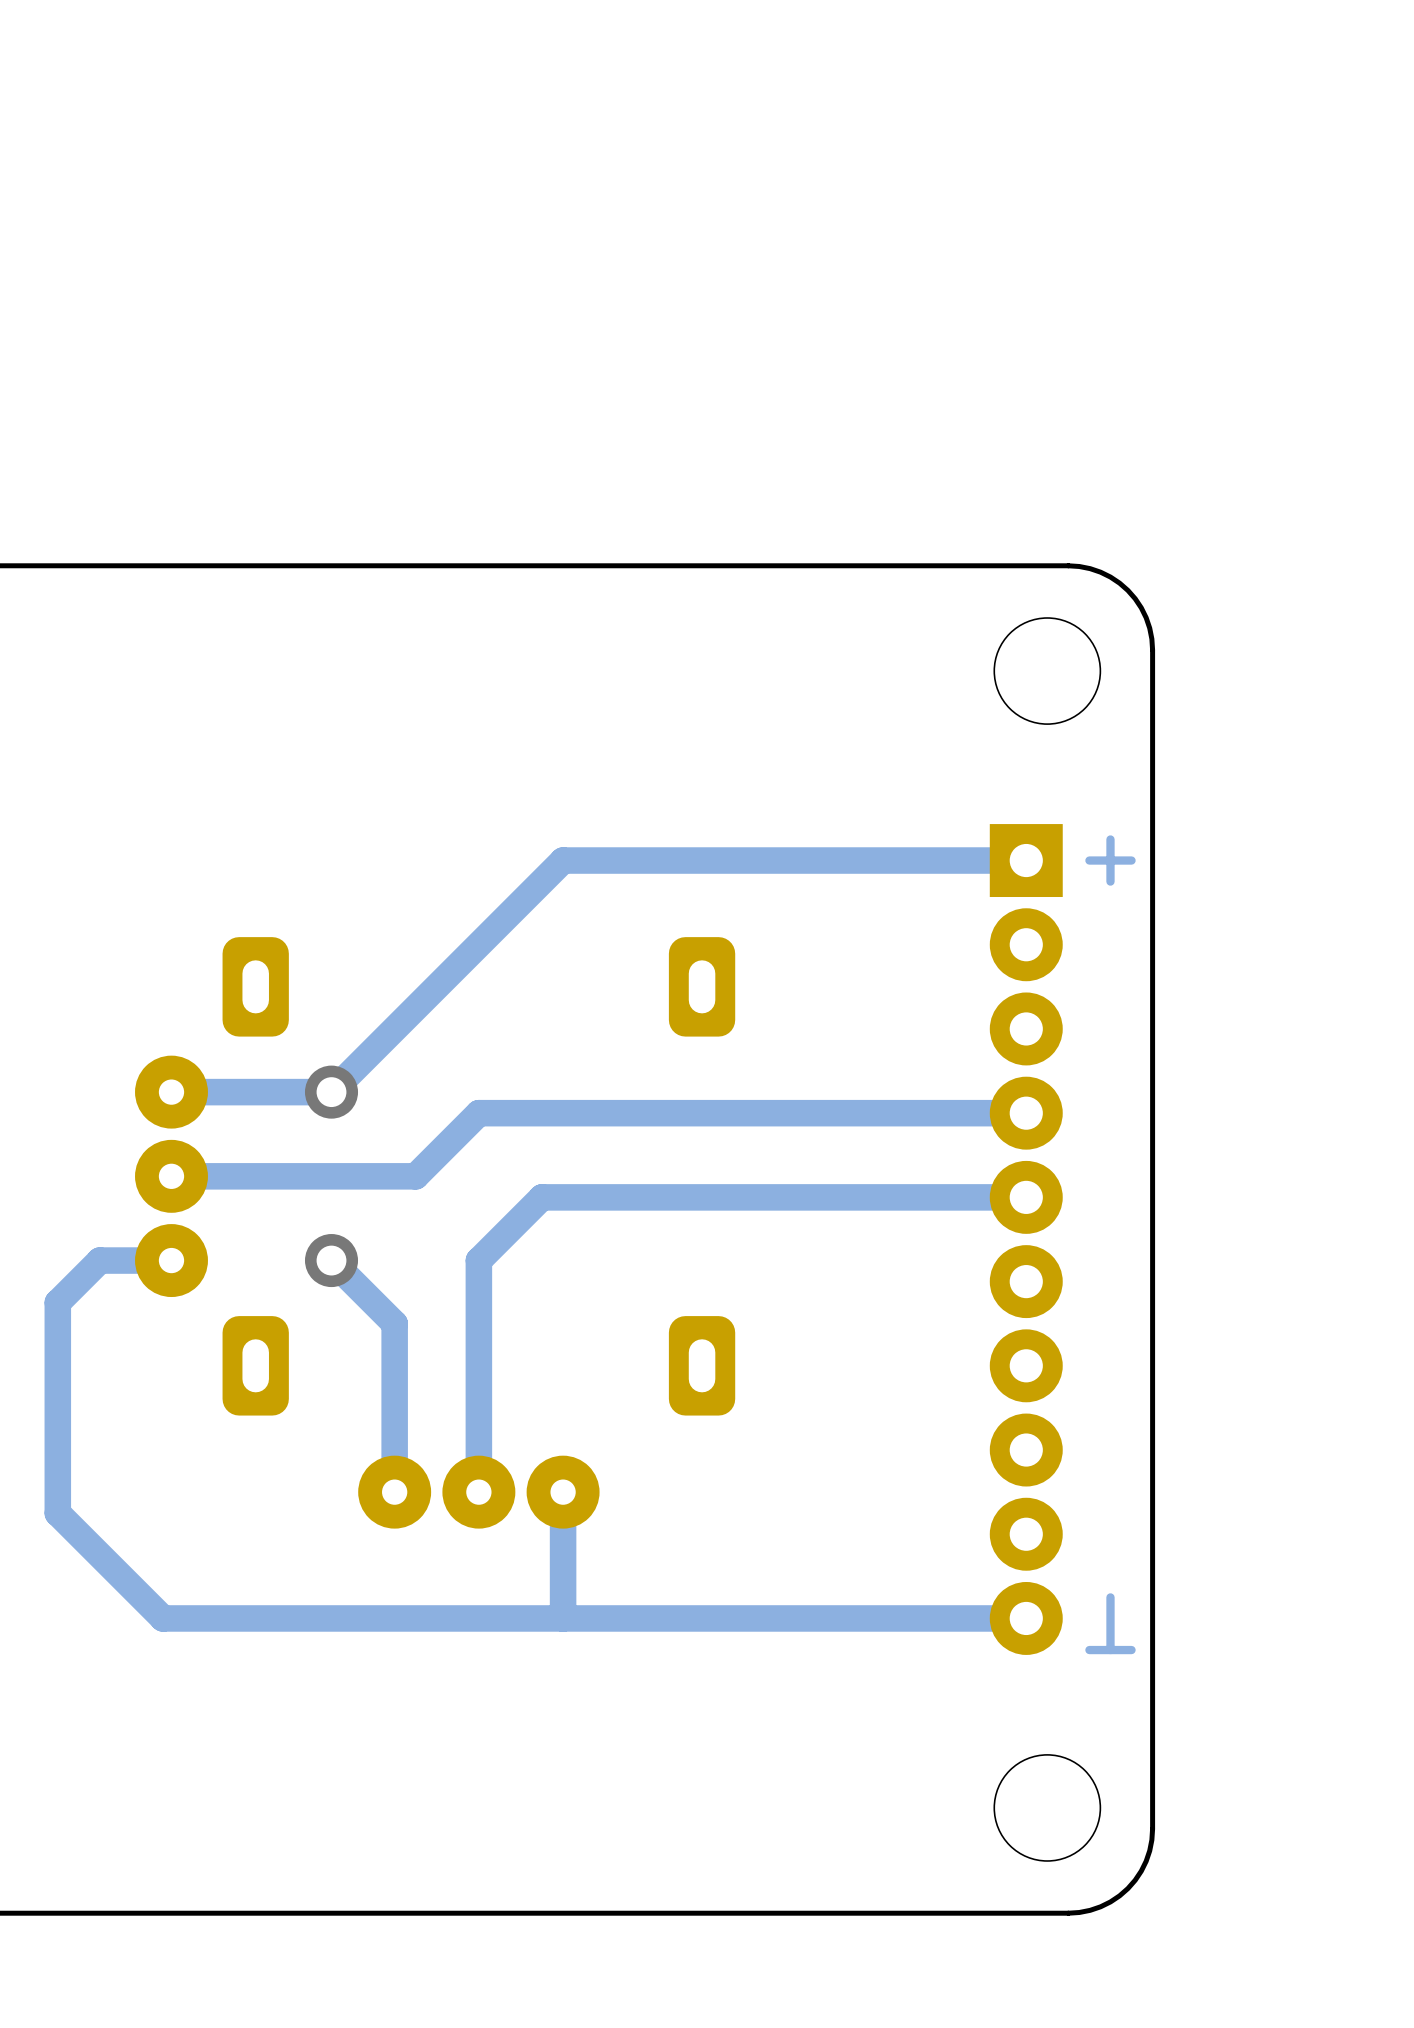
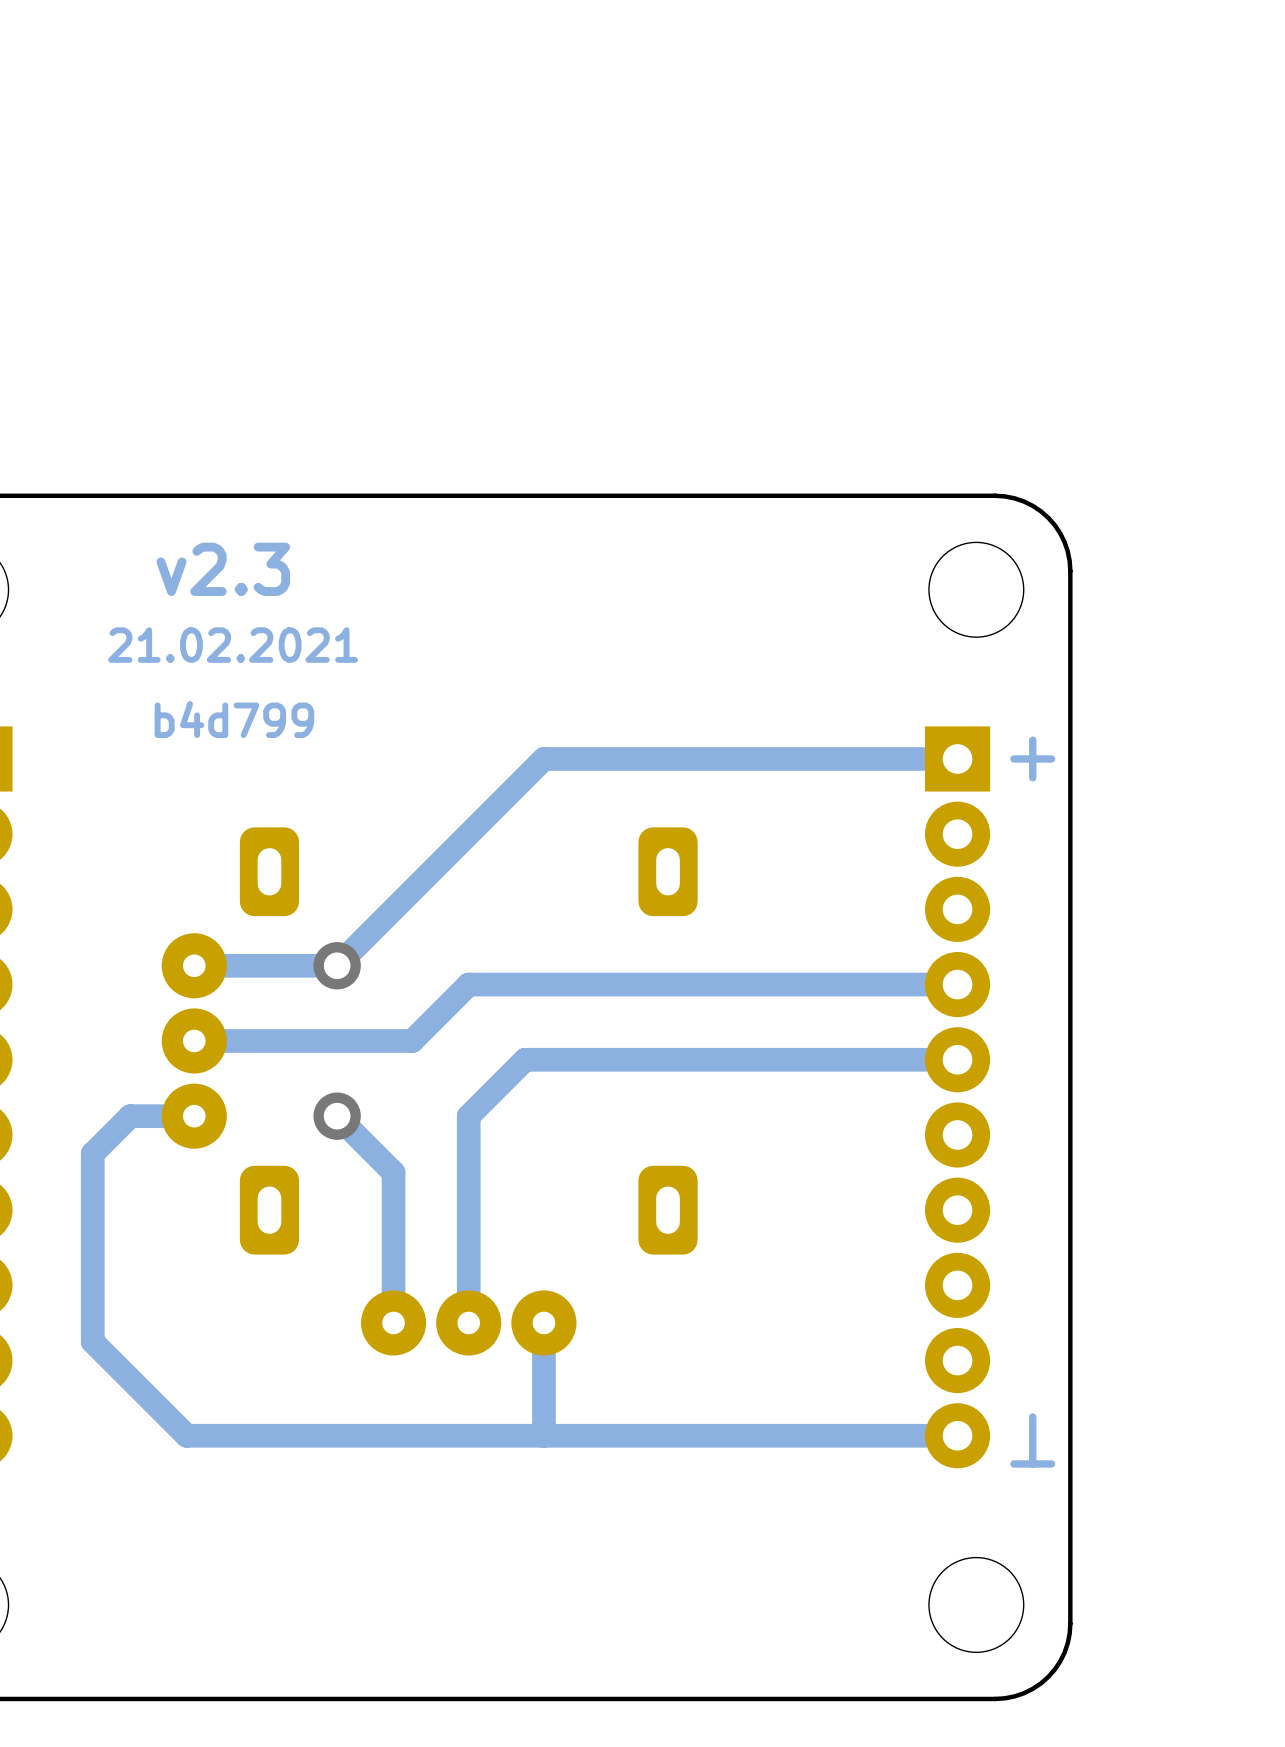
text: none -> v2.3 (223, 569)
text: none -> 21.02.2021 (233, 645)
text: none -> b4d799 (234, 719)

